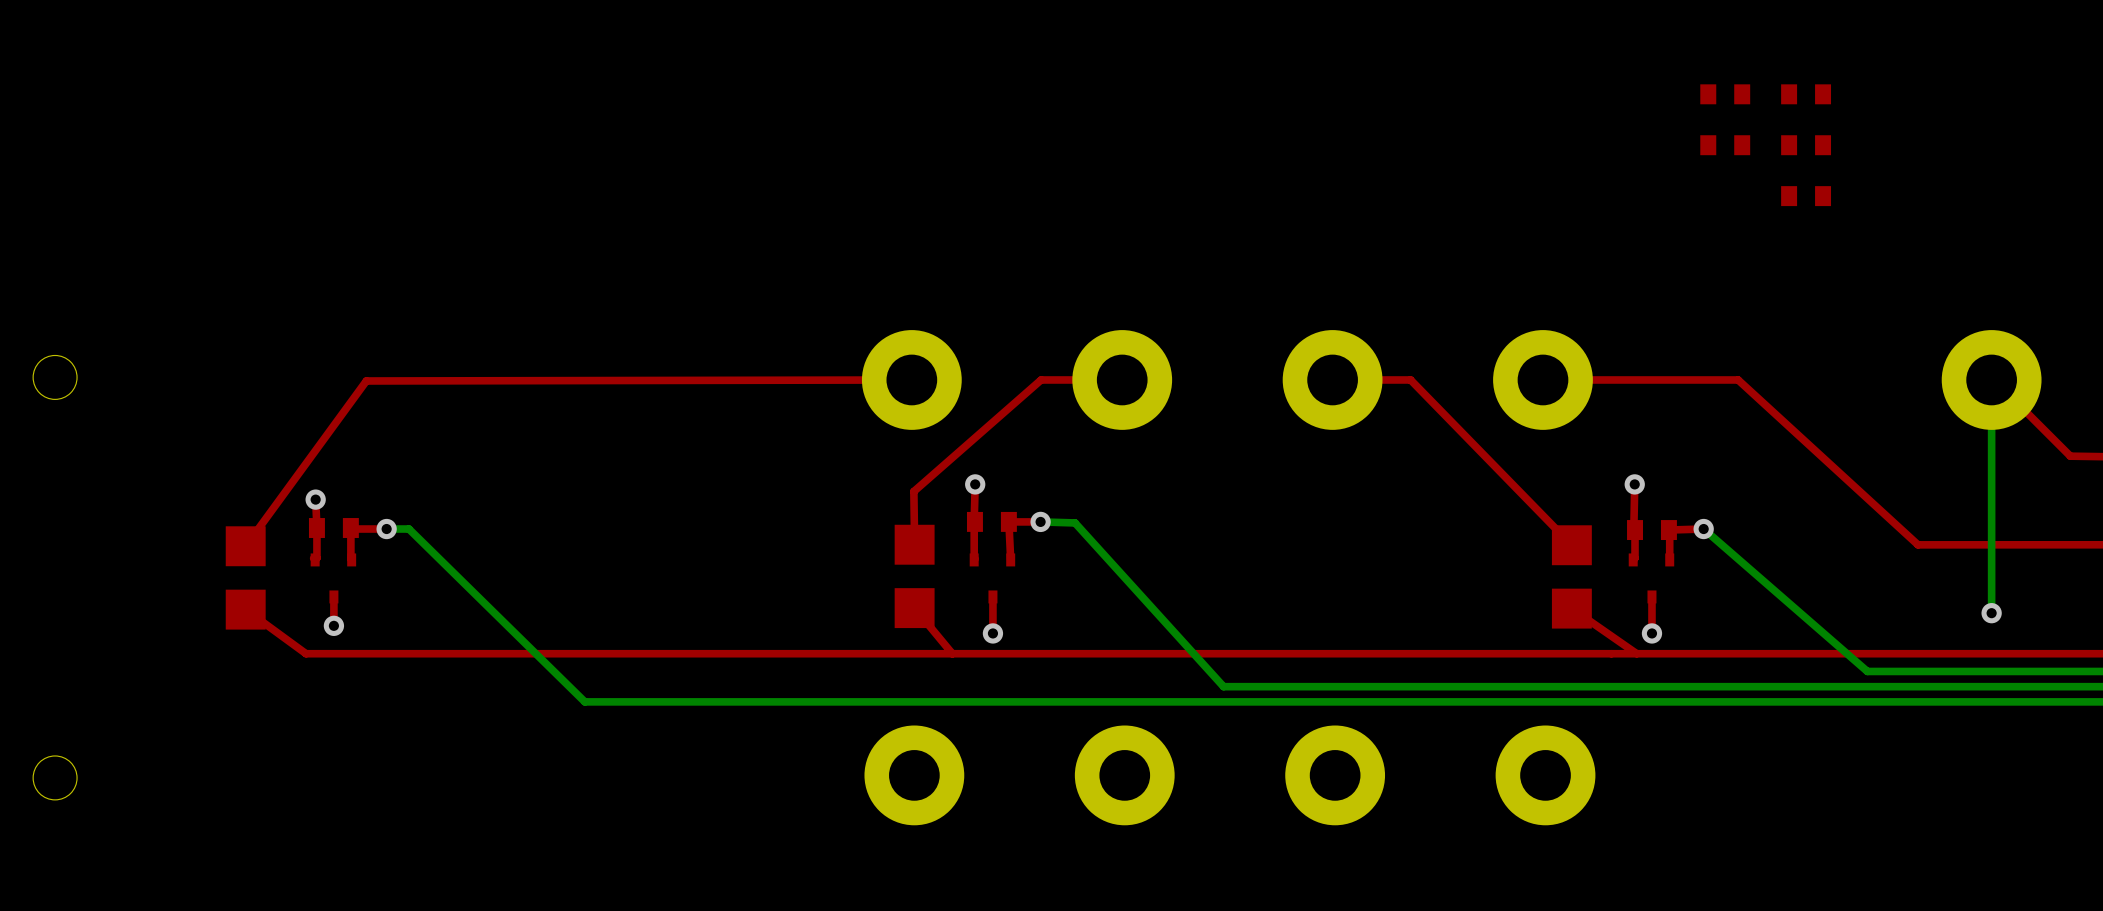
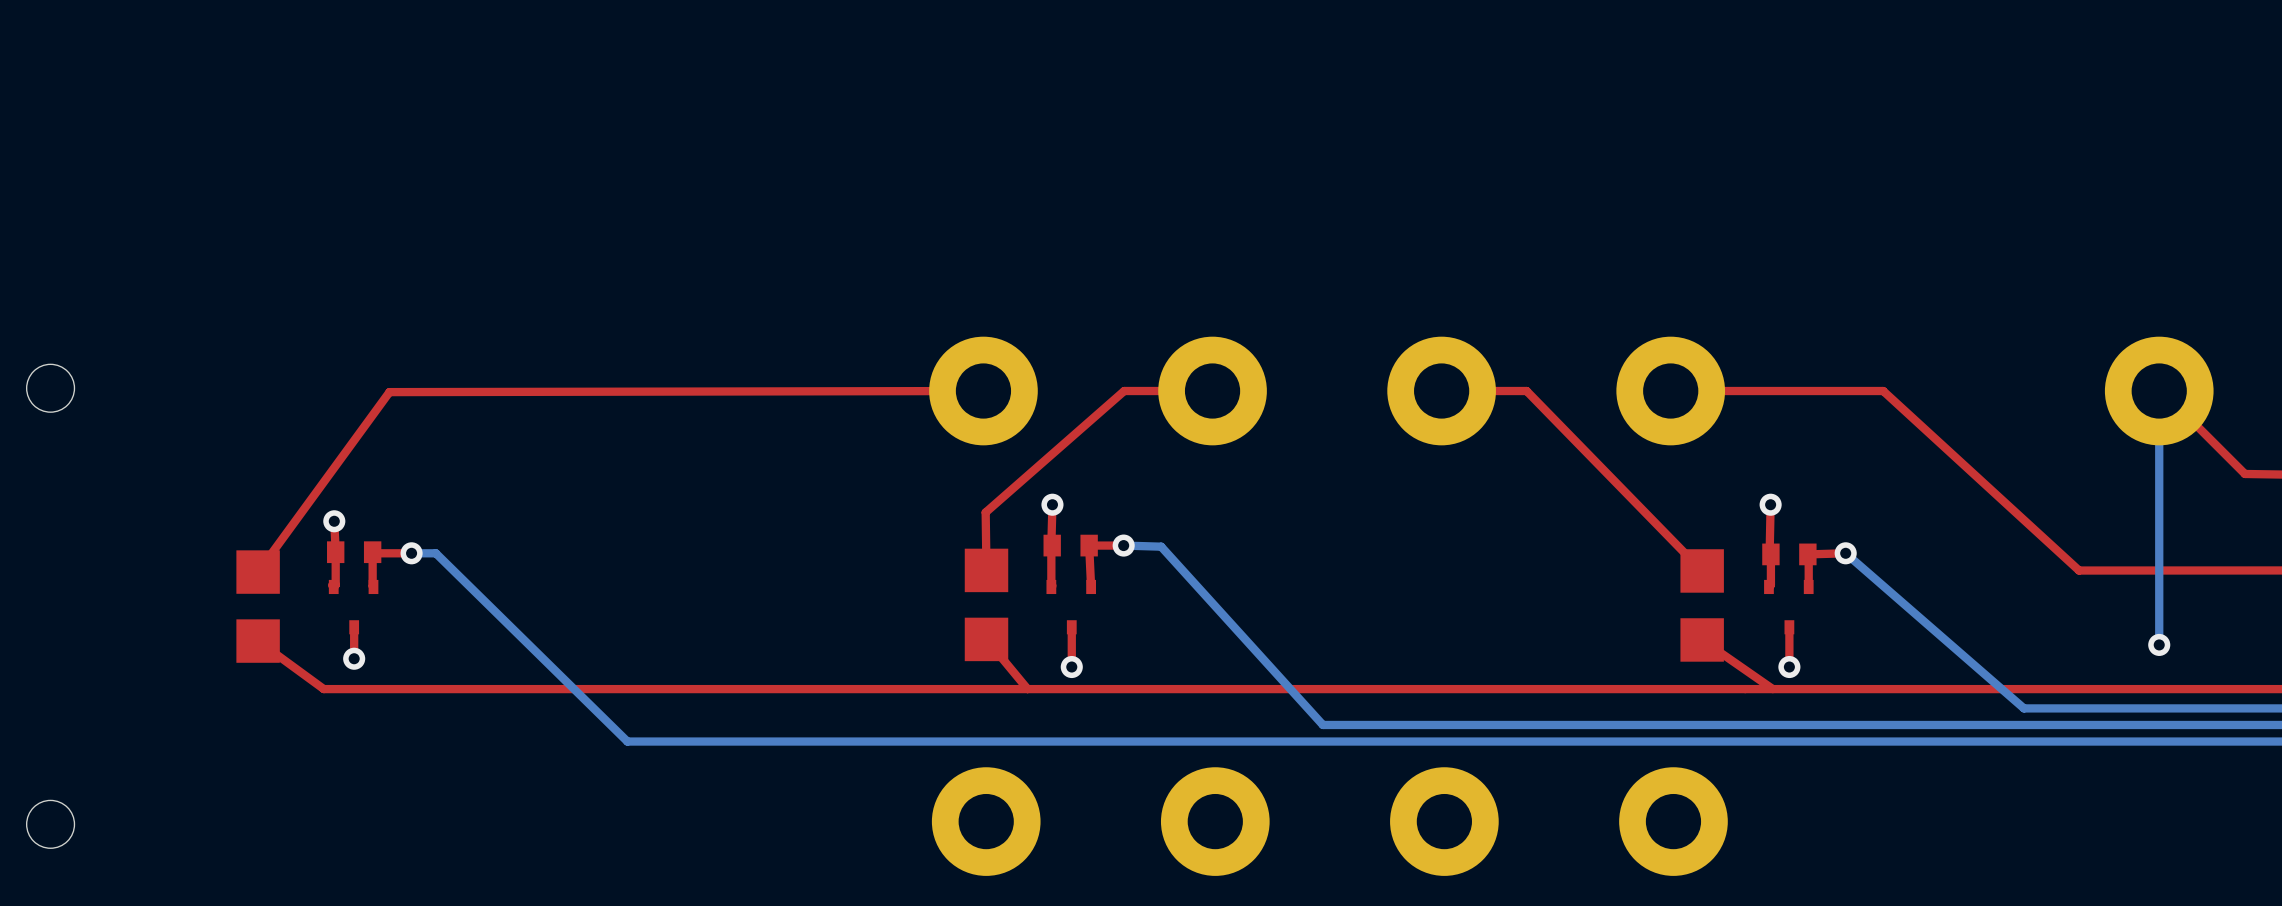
part: (1725, 94) -> none
part: (1806, 94) -> none
part: (1725, 145) -> none
part: (1806, 145) -> none
part: (1806, 196) -> none

